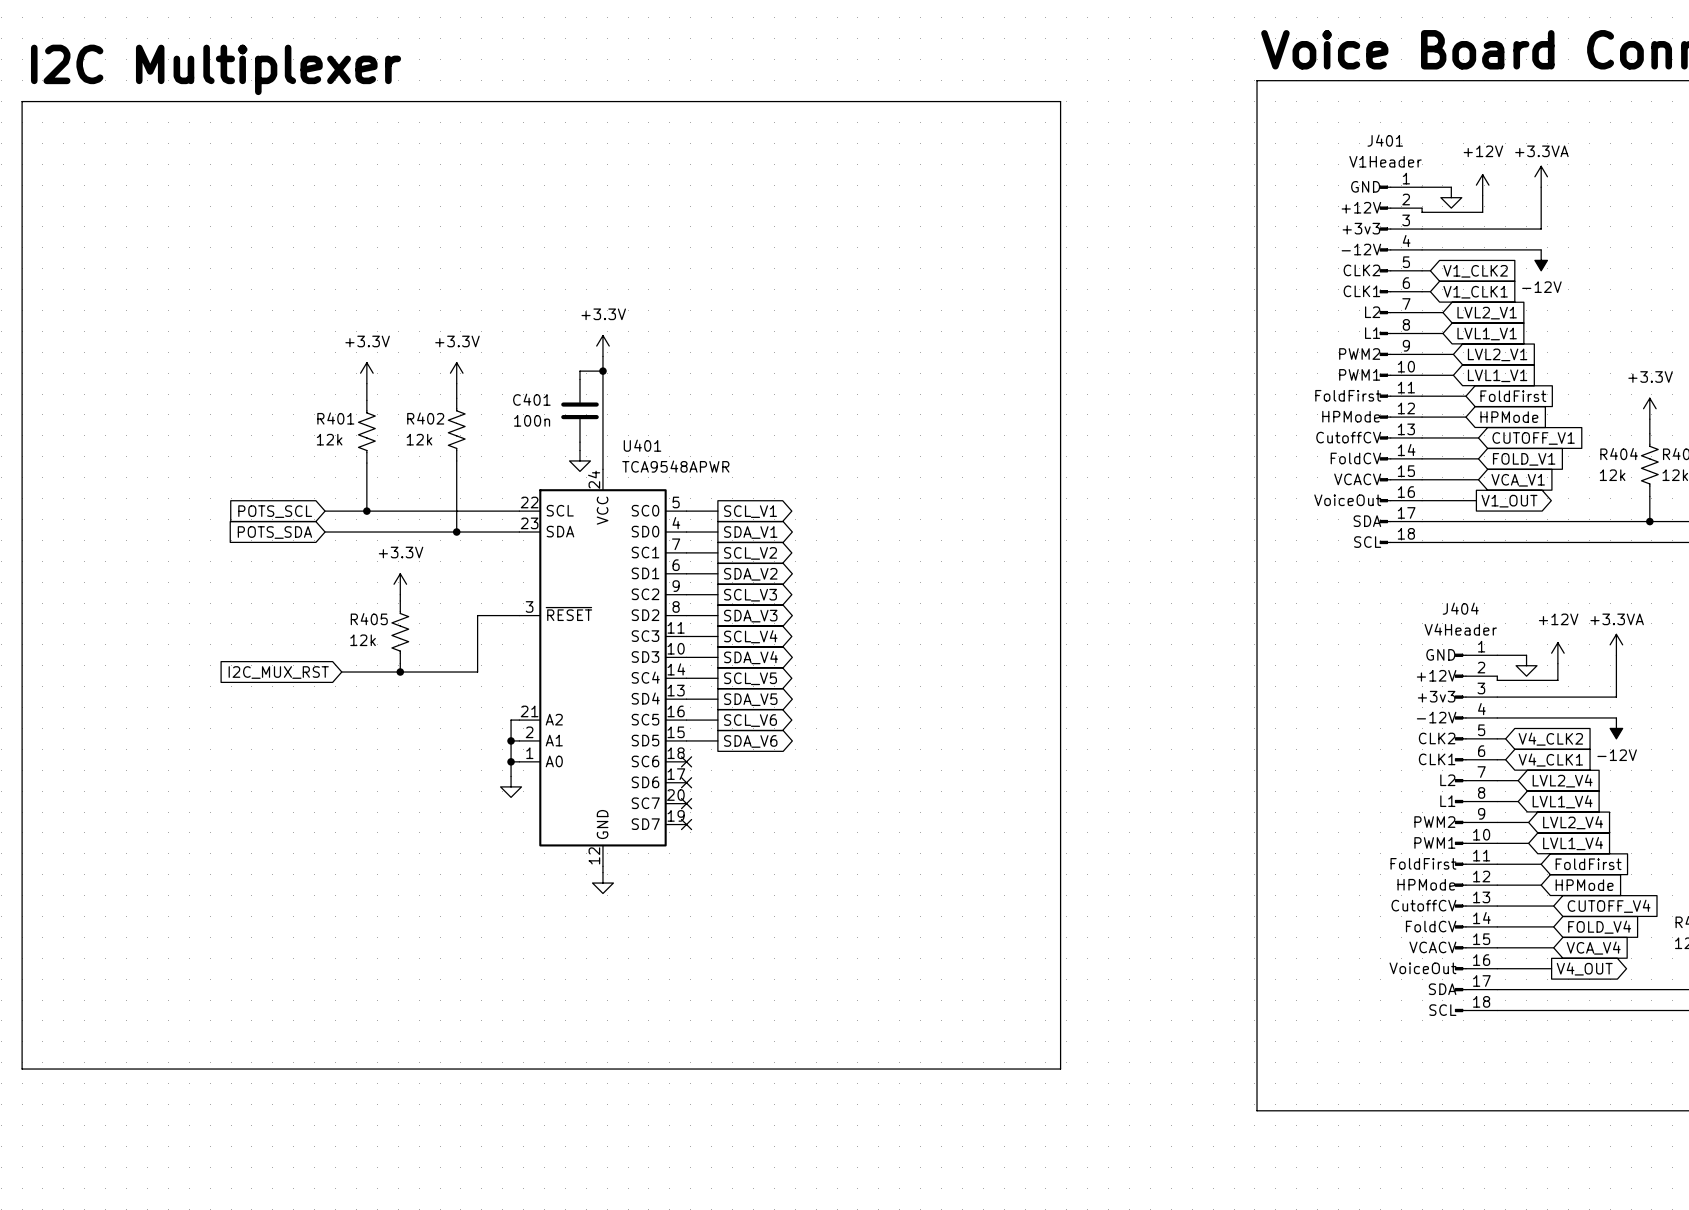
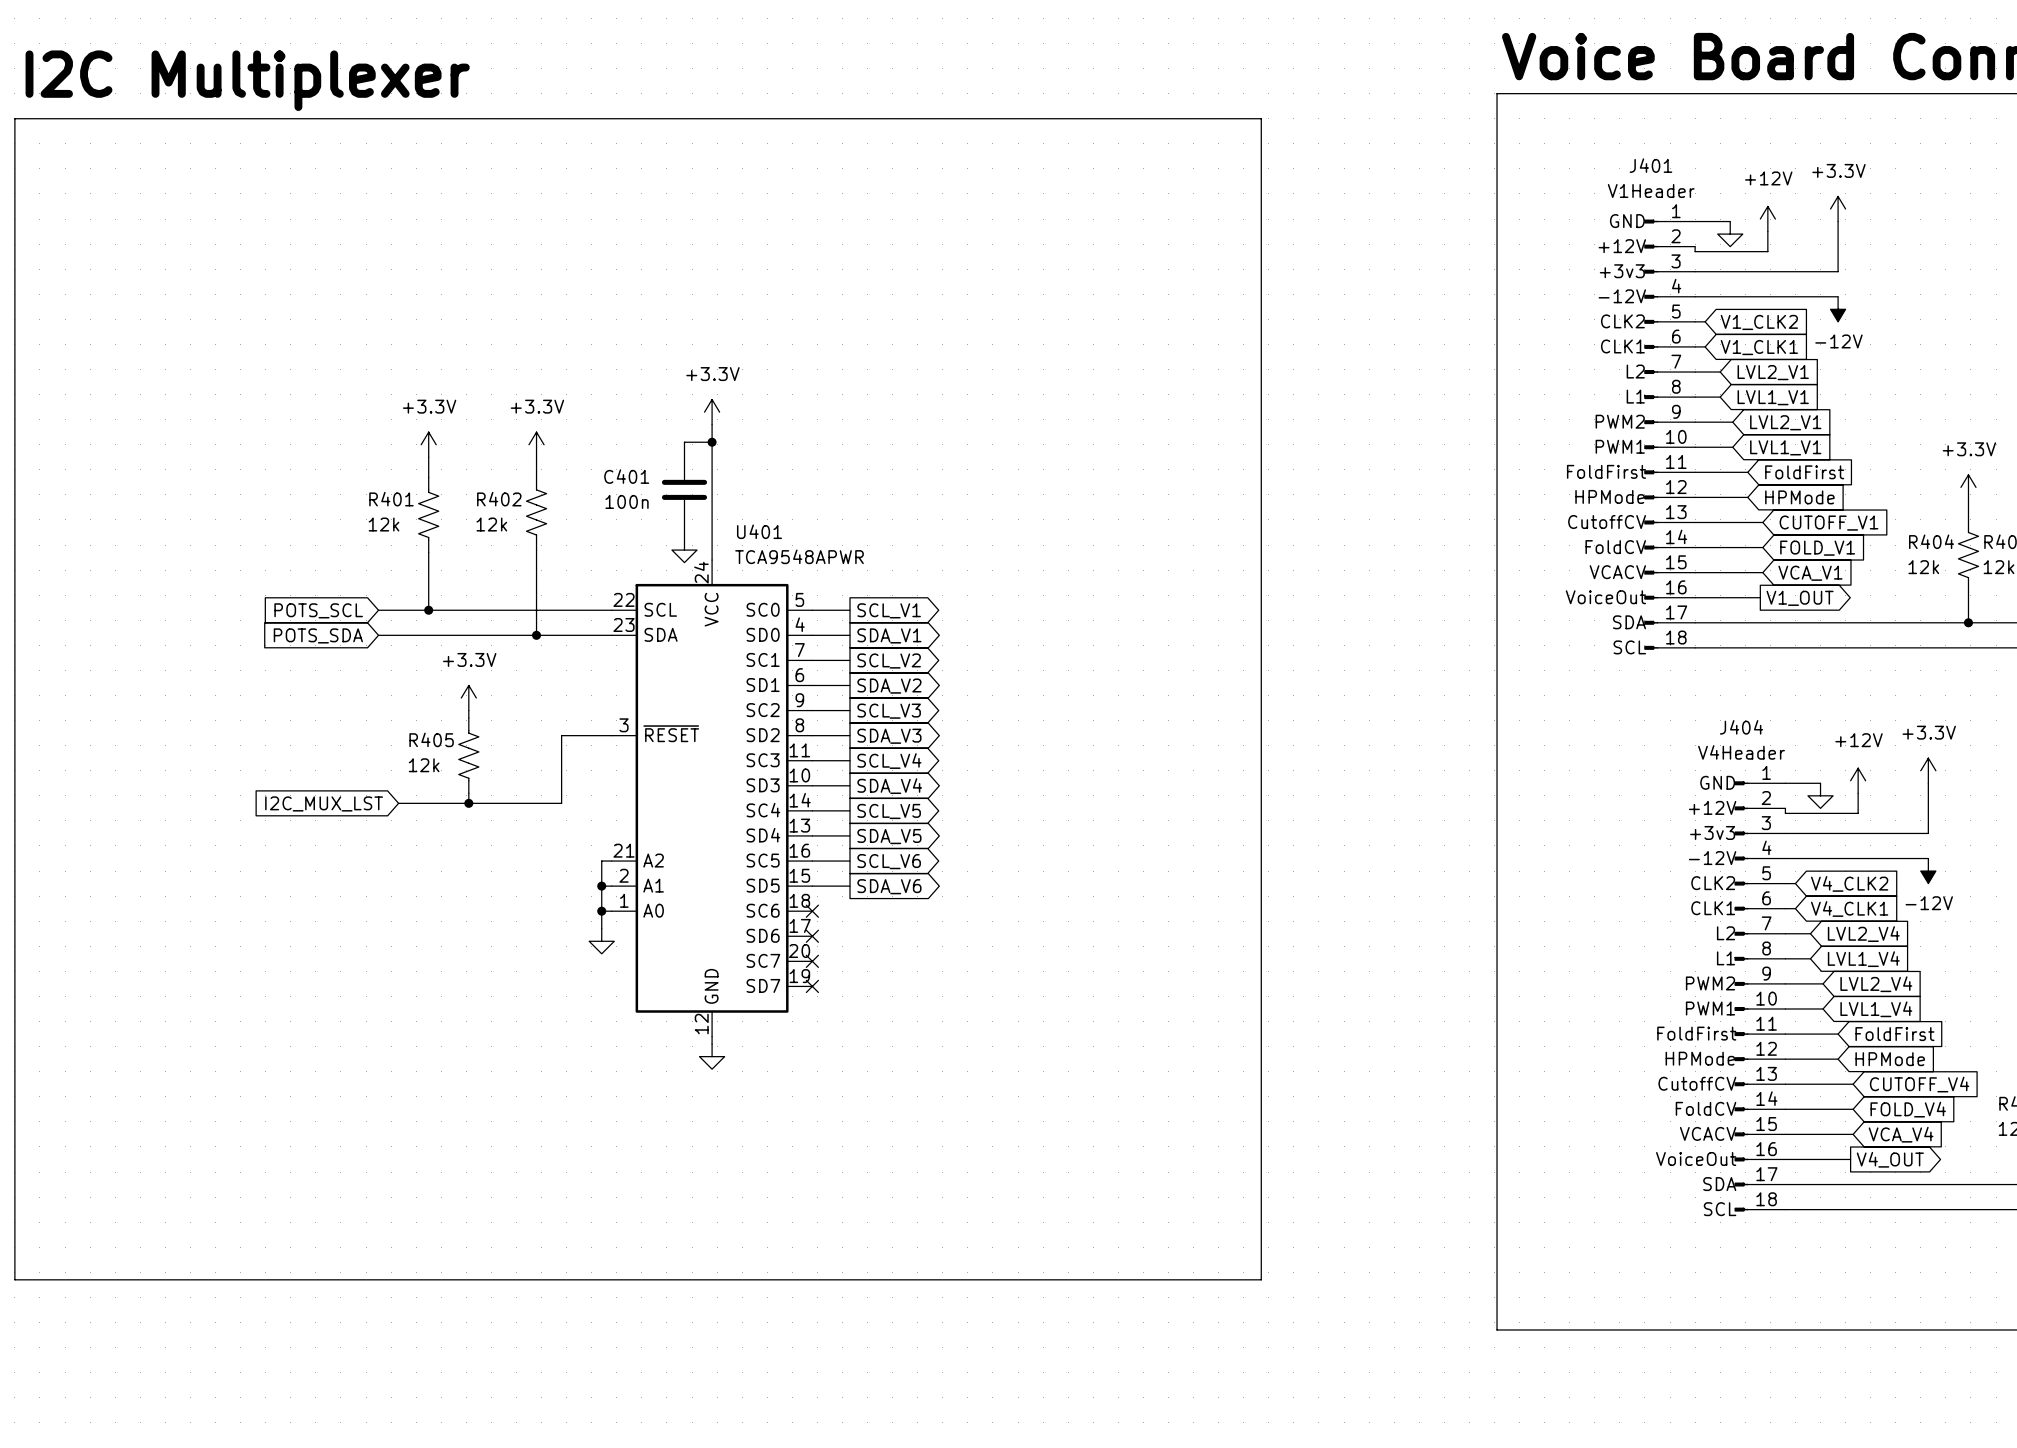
power symbol: +3.3VA (1541, 176) -> +3.3V (1838, 209)
power symbol: +3.3VA (1616, 644) -> +3.3V (1928, 770)
global label: I2C_MUX_RST (278, 672) -> I2C_MUX_LST (324, 803)

